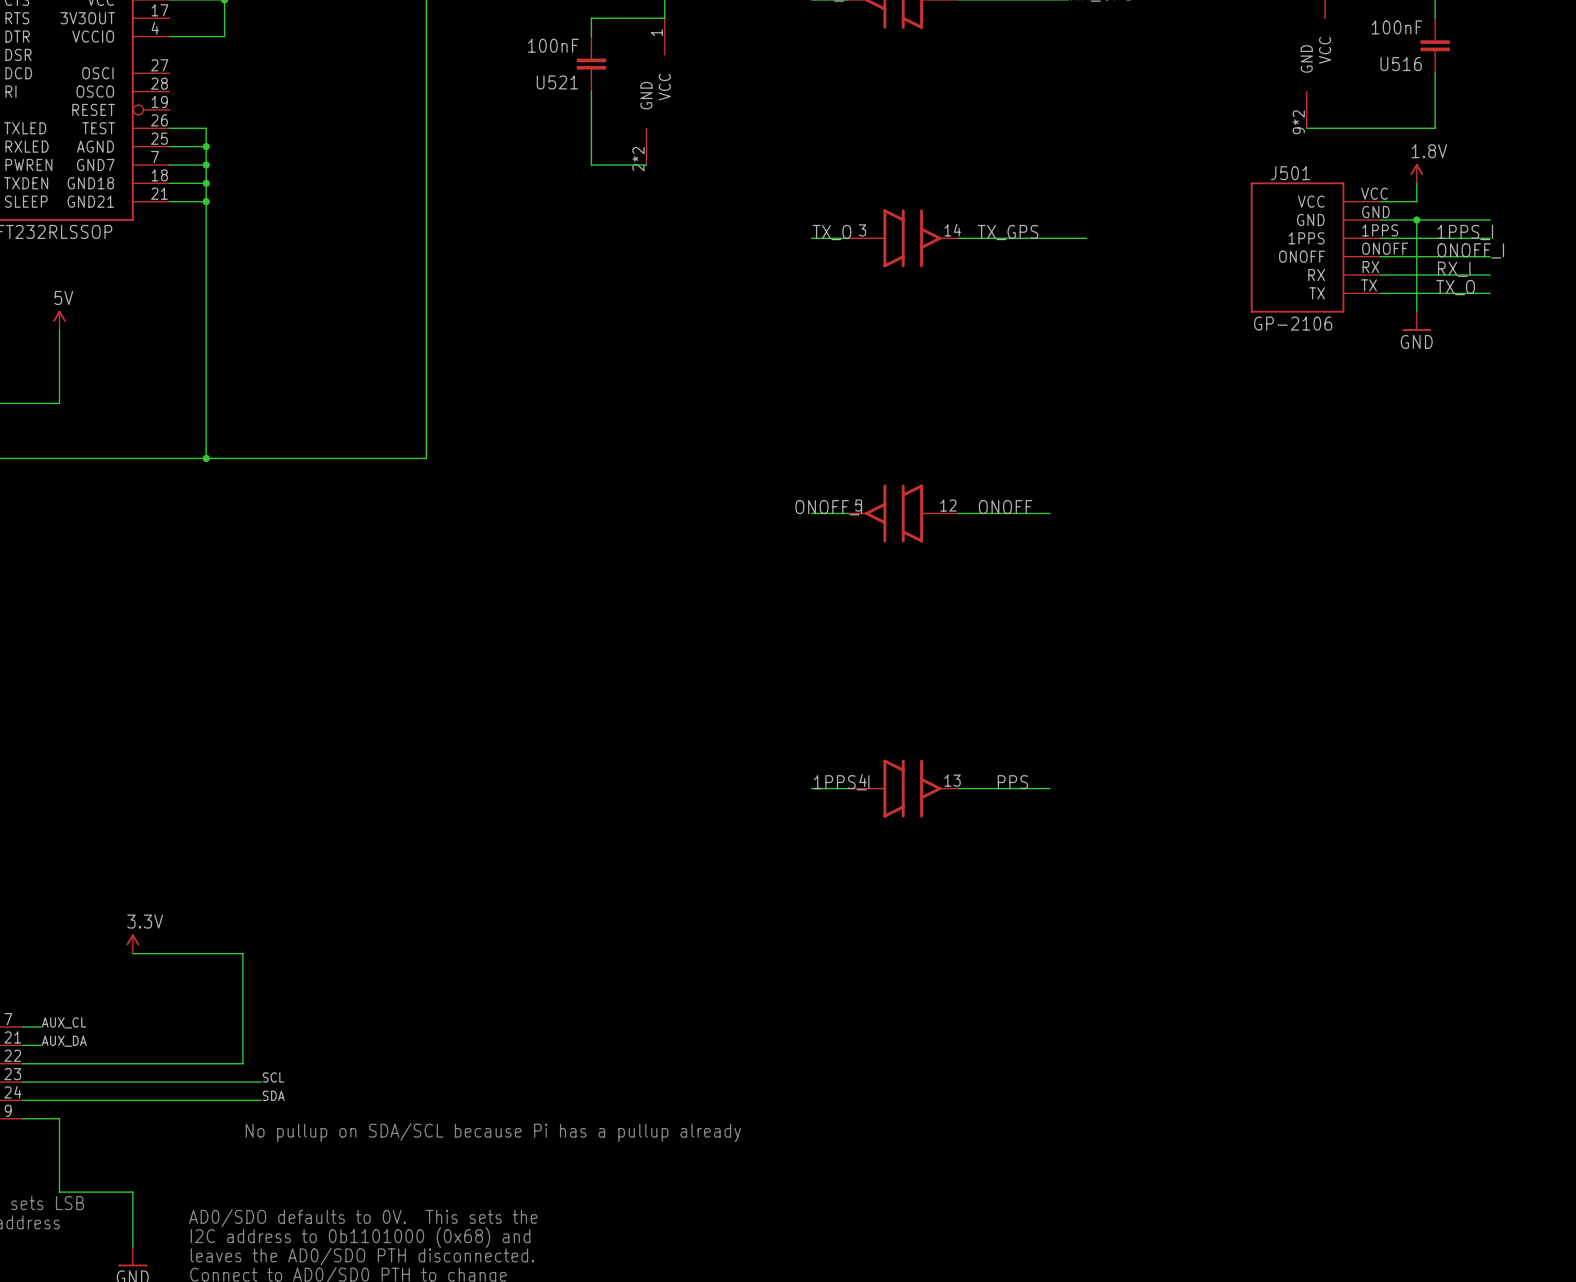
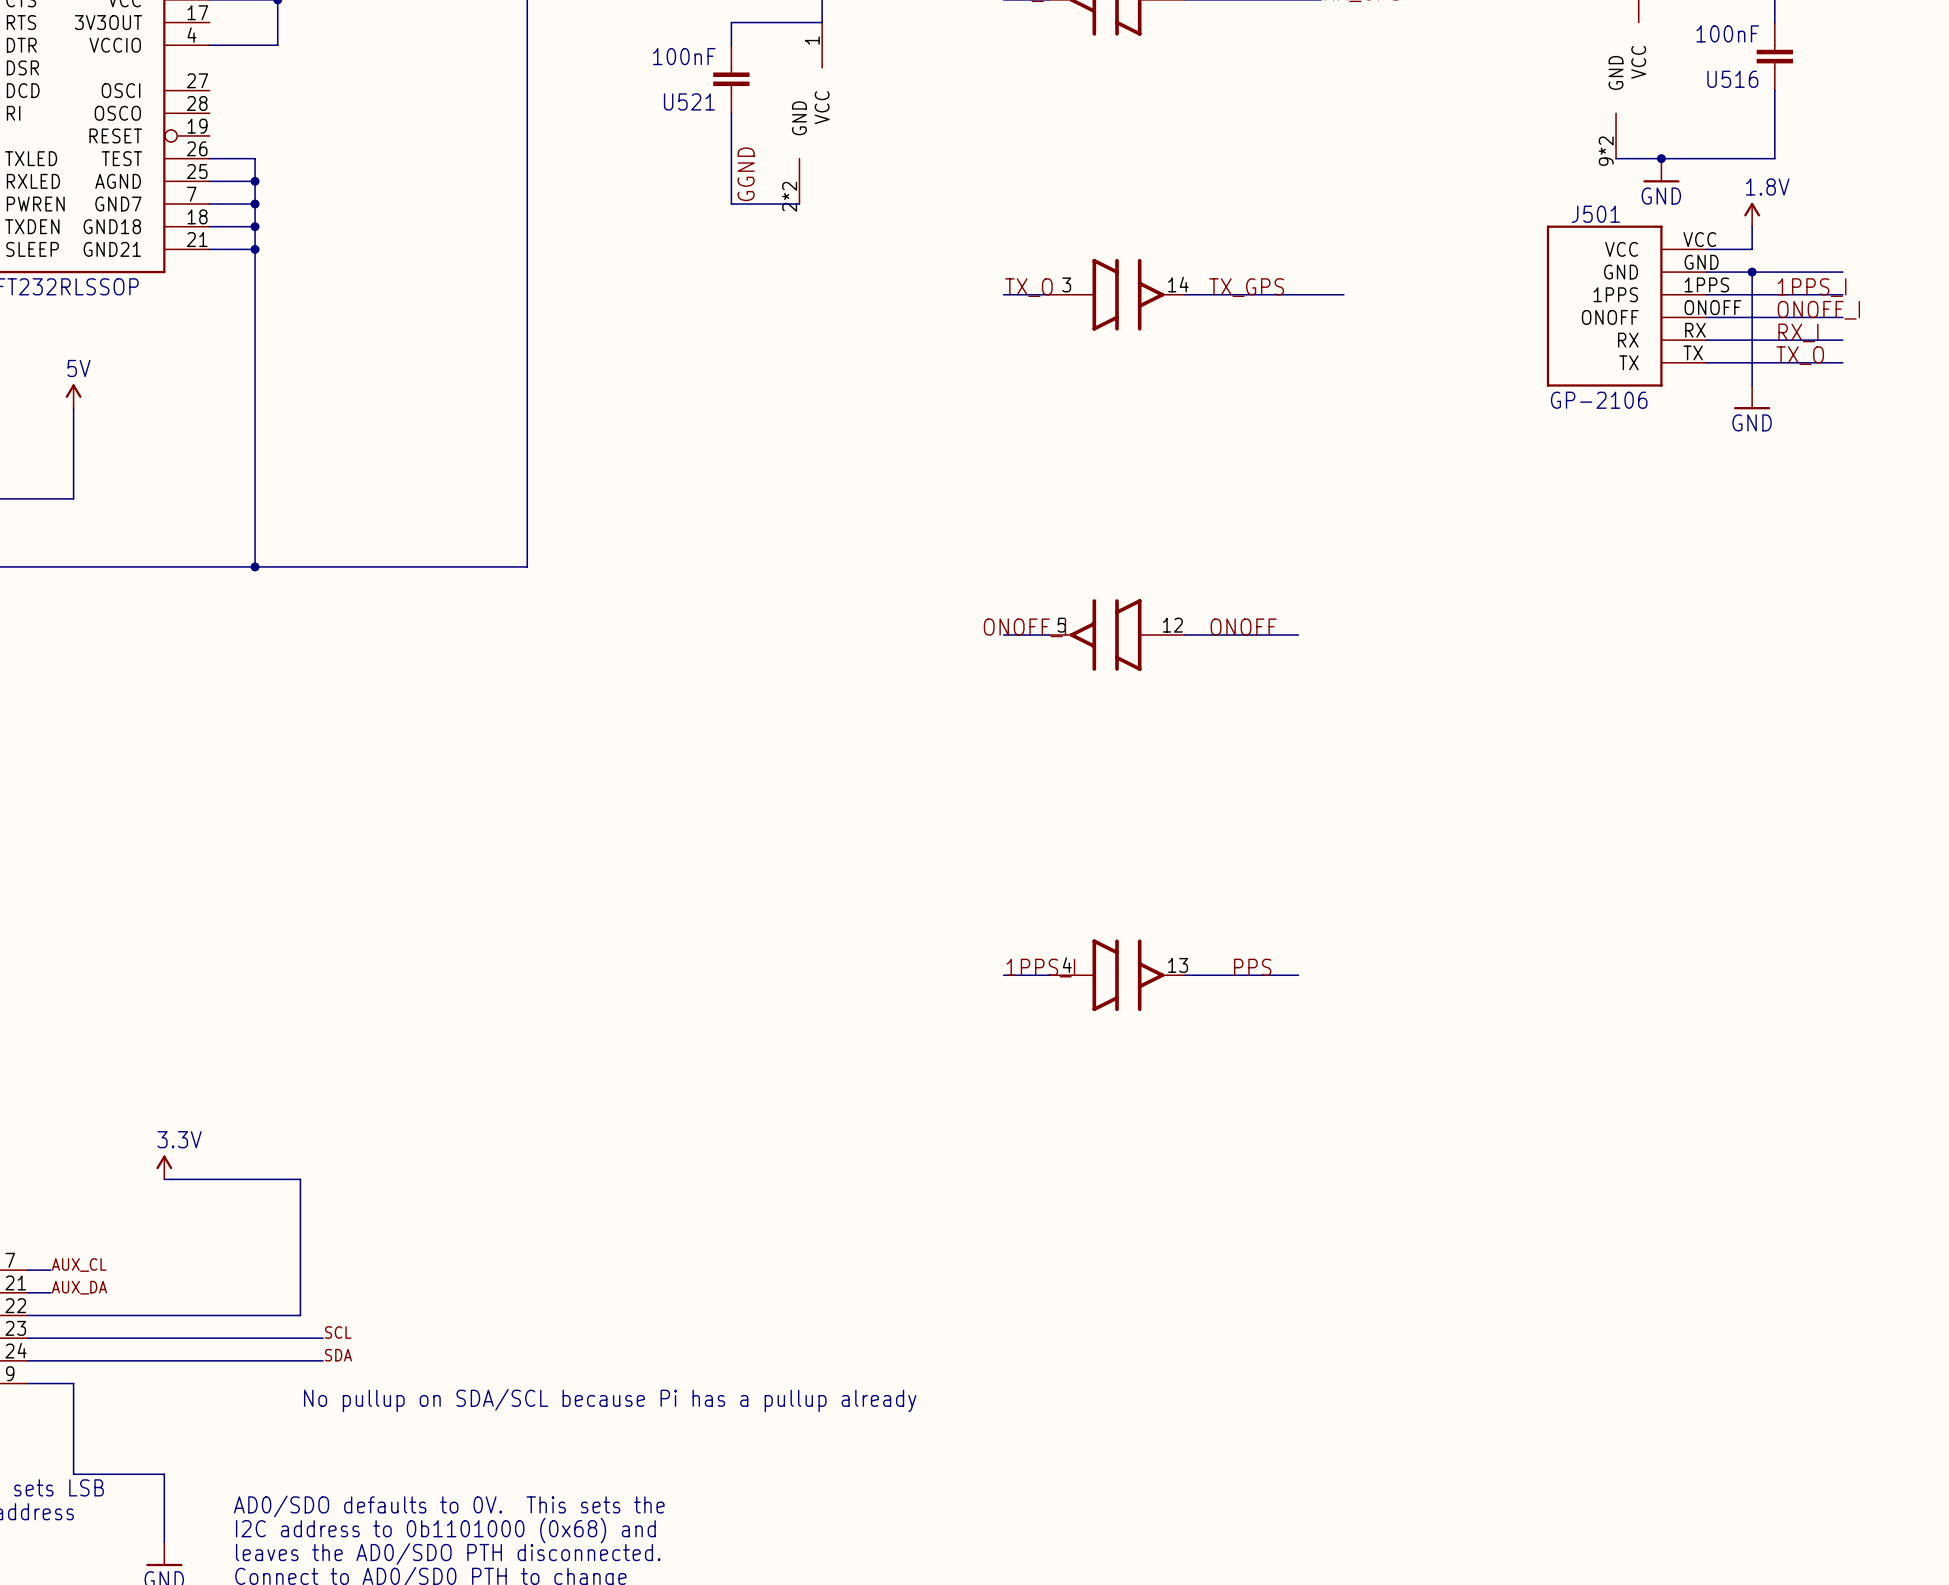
junction: none -> (1661, 158)
power symbol: none -> GND (1661, 170)
label: none -> GGND (746, 174)

